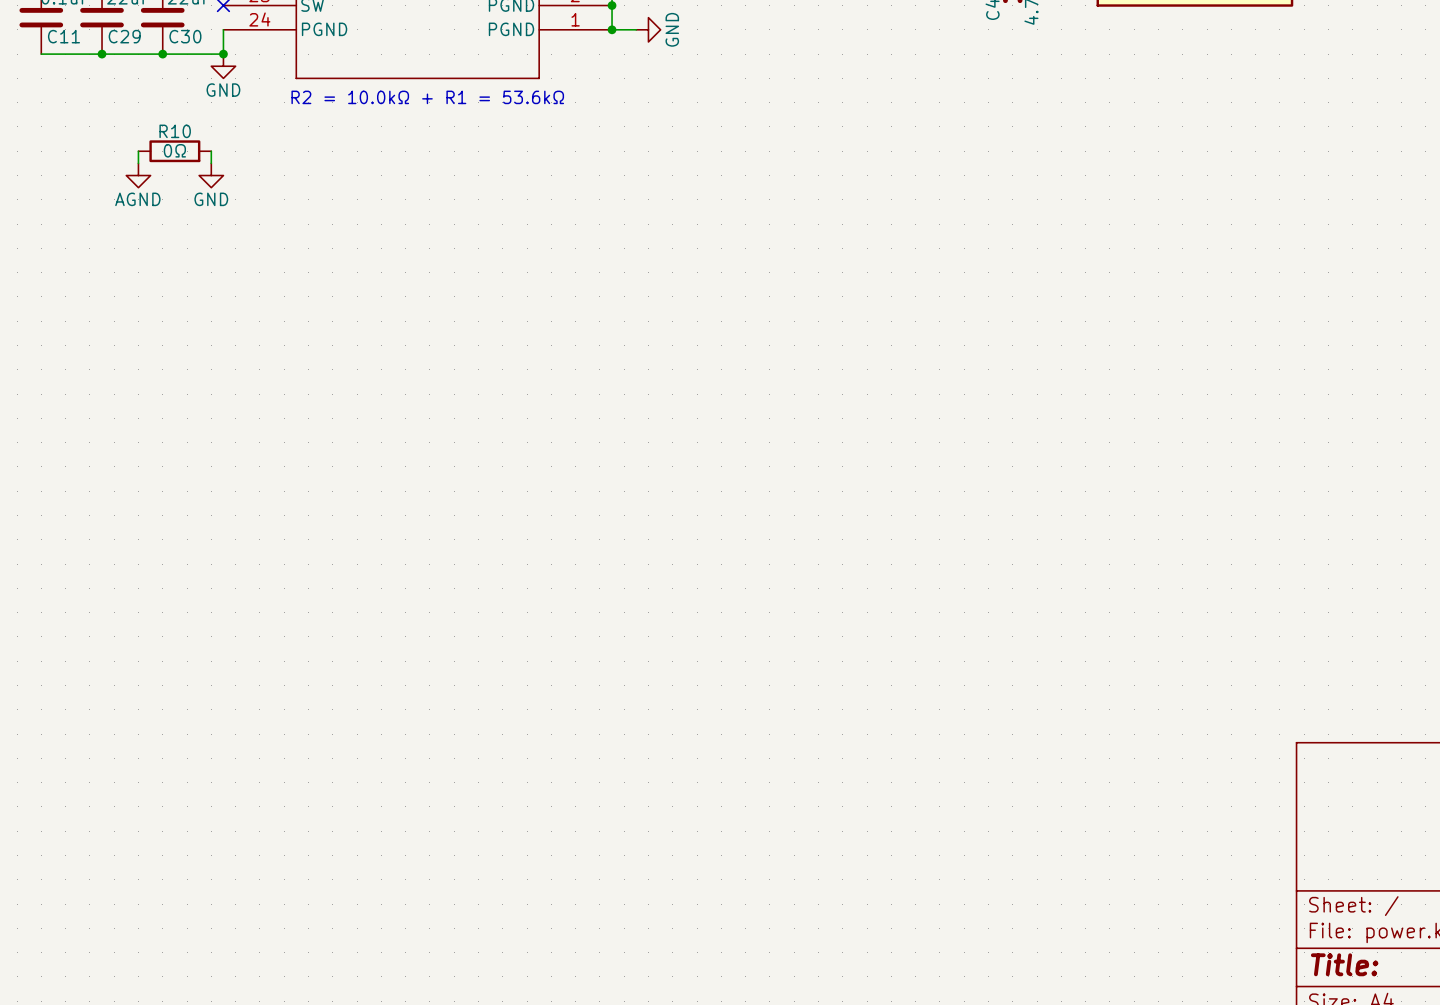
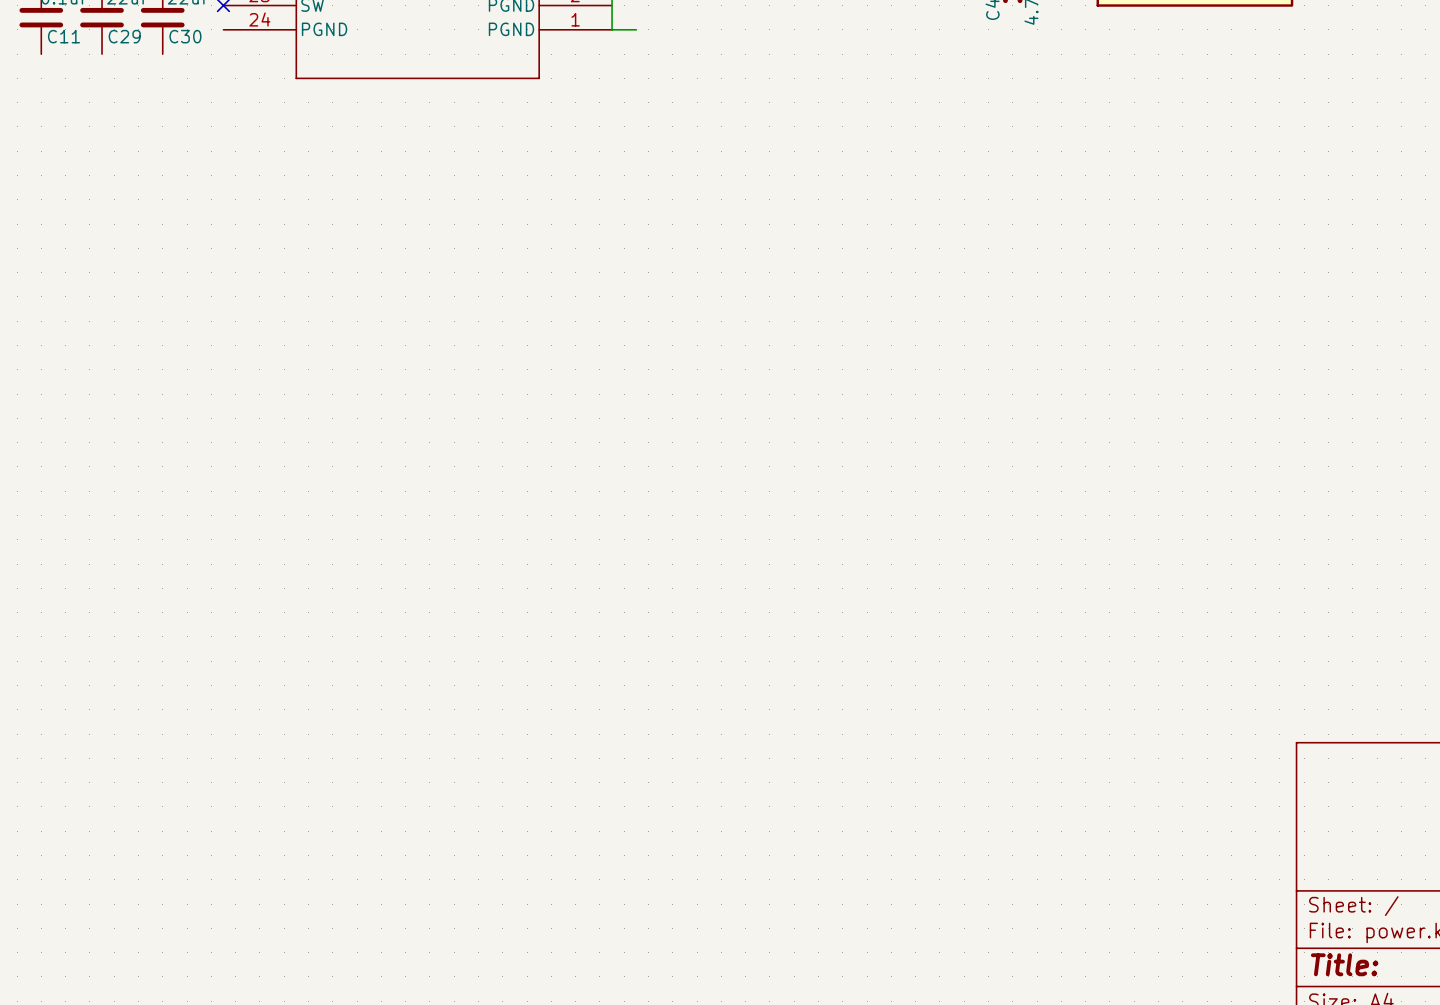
junction: (612, 5) -> none
wire: (223, 29) (223, 54) (41, 54) -> none
junction: (612, 29) -> none
power symbol: GND (648, 29) -> none
junction: (102, 54) -> none
junction: (162, 54) -> none
junction: (223, 54) -> none
power symbol: GND (223, 66) -> none
text: R2 = 10.0kΩ + R1 = 53.6kΩ (427, 97) -> none
wire: (138, 151) (138, 163) -> none
R10: 0Ω (174, 151) -> none
wire: (211, 151) (211, 163) -> none
power symbol: AGND (138, 175) -> none
power symbol: GND (211, 175) -> none

